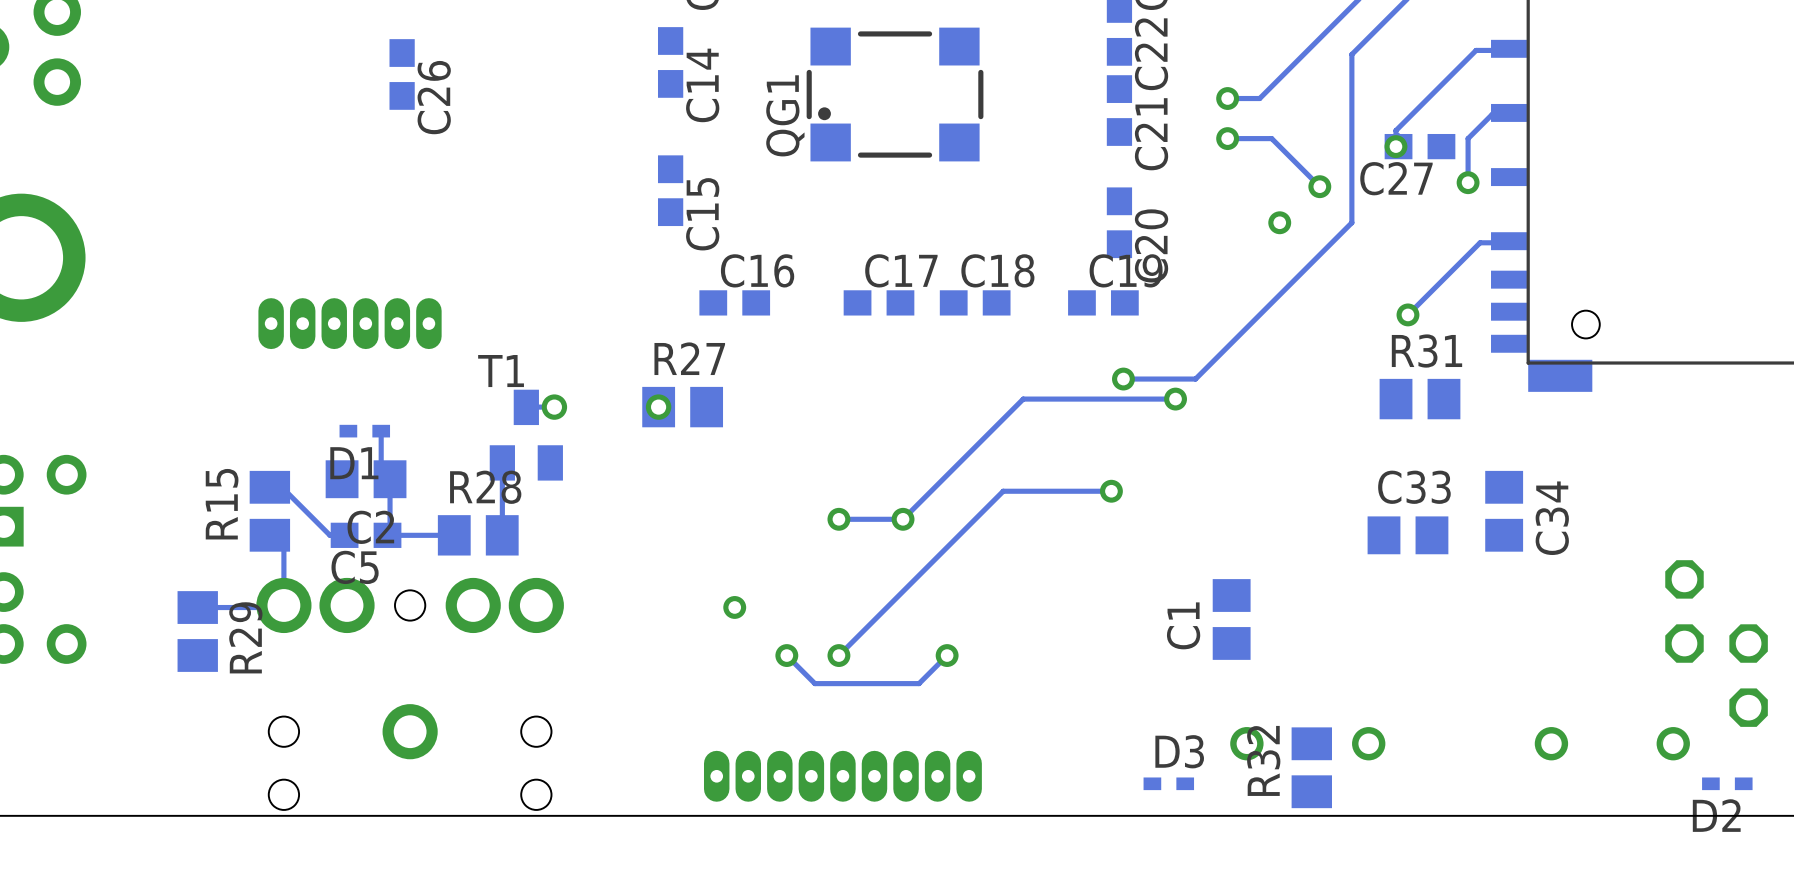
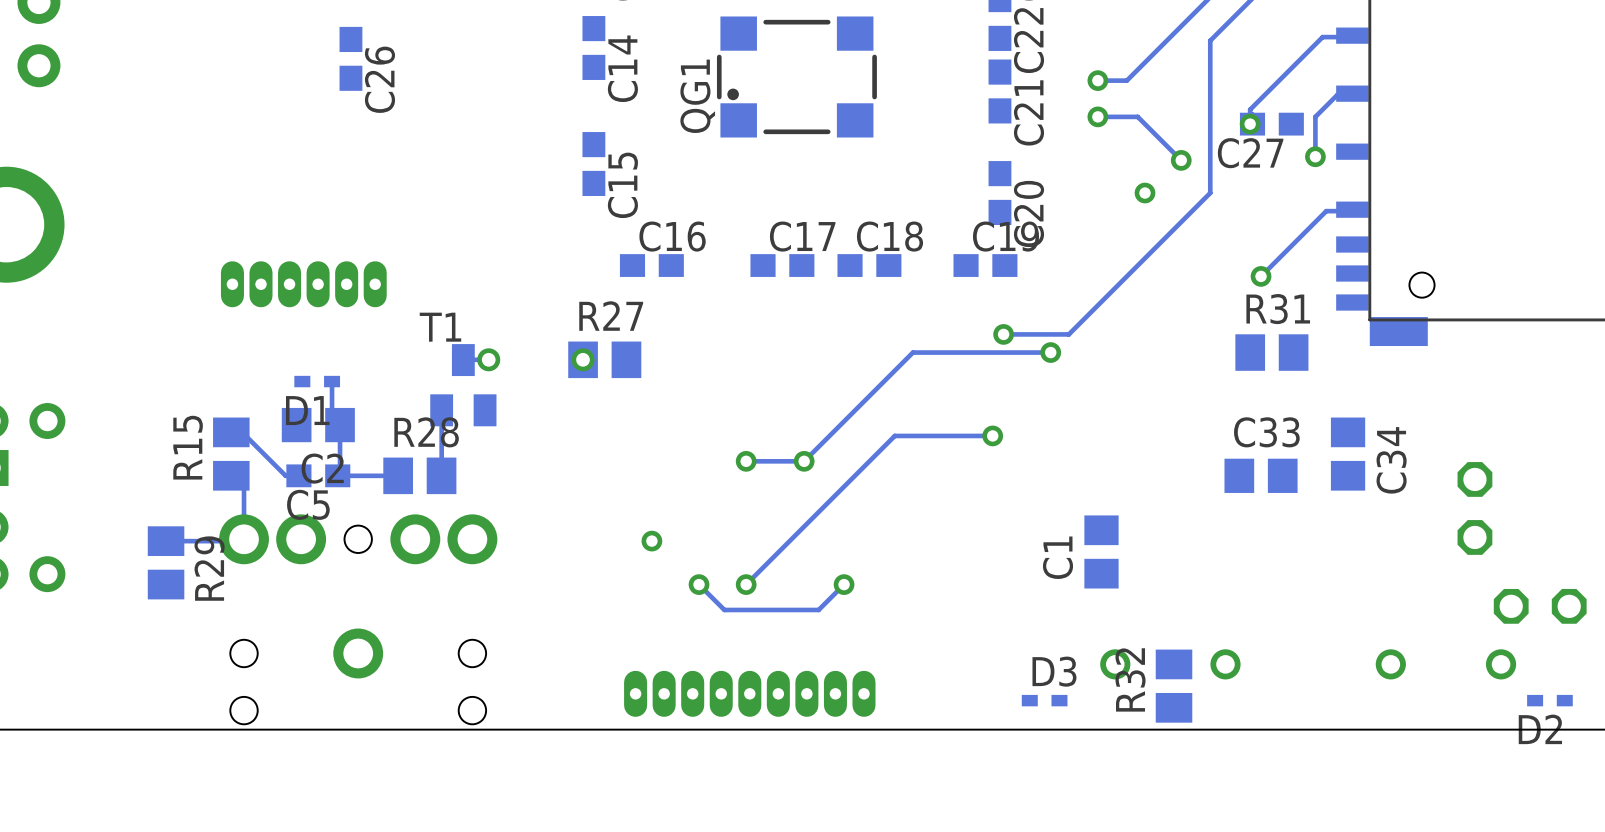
part: none -> (1474, 508)
part: (1684, 611) -> none
part rotation: 0° (1748, 675) -> 90° clockwise (1540, 606)

